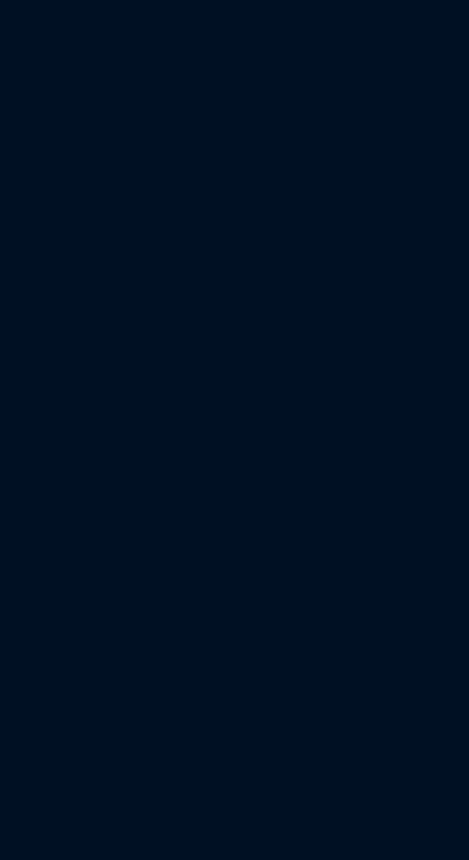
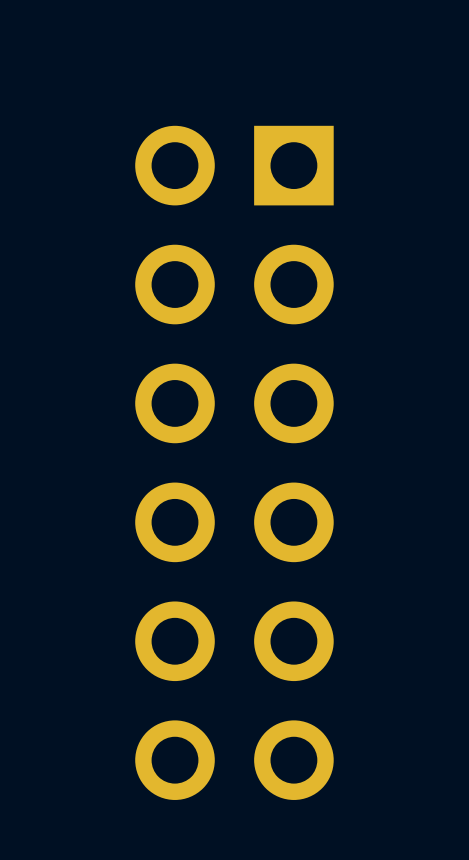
part: none -> (234, 462)

